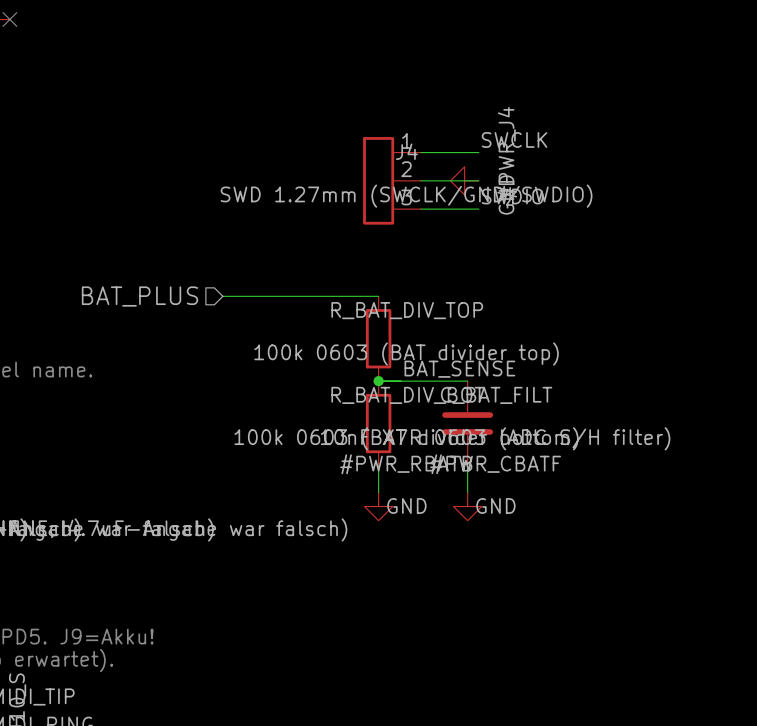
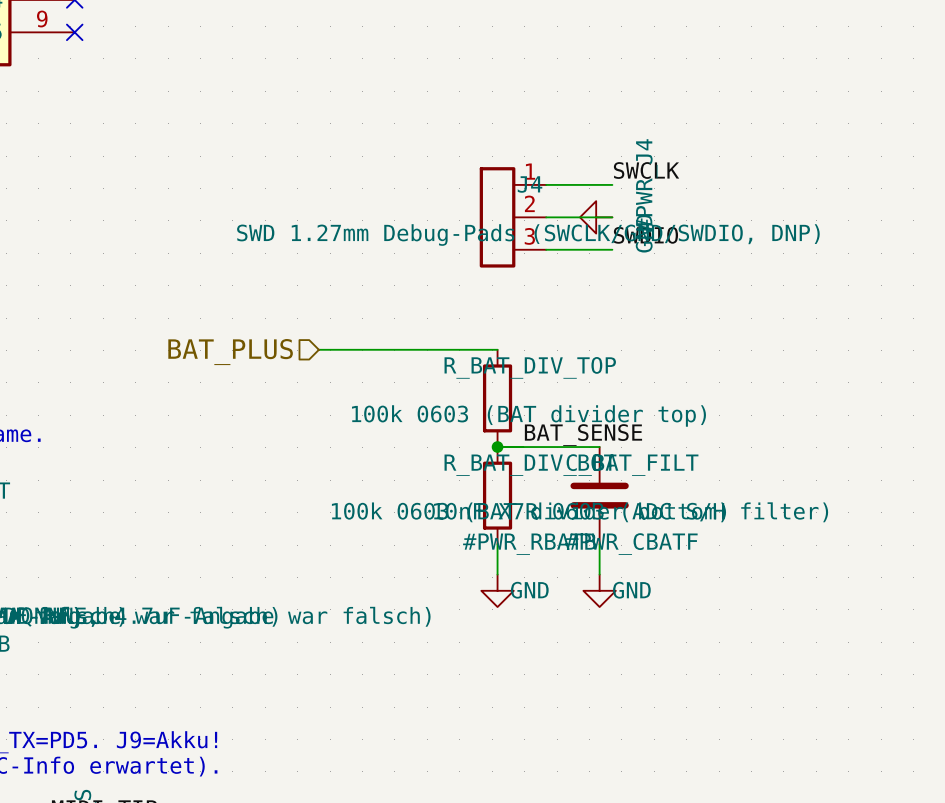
J4 value: SWD 1.27mm (SWCLK/GND/SWDIO) (406, 196) -> SWD 1.27mm Debug-Pads (SWCLK/GND/SWDIO, DNP) (528, 235)

